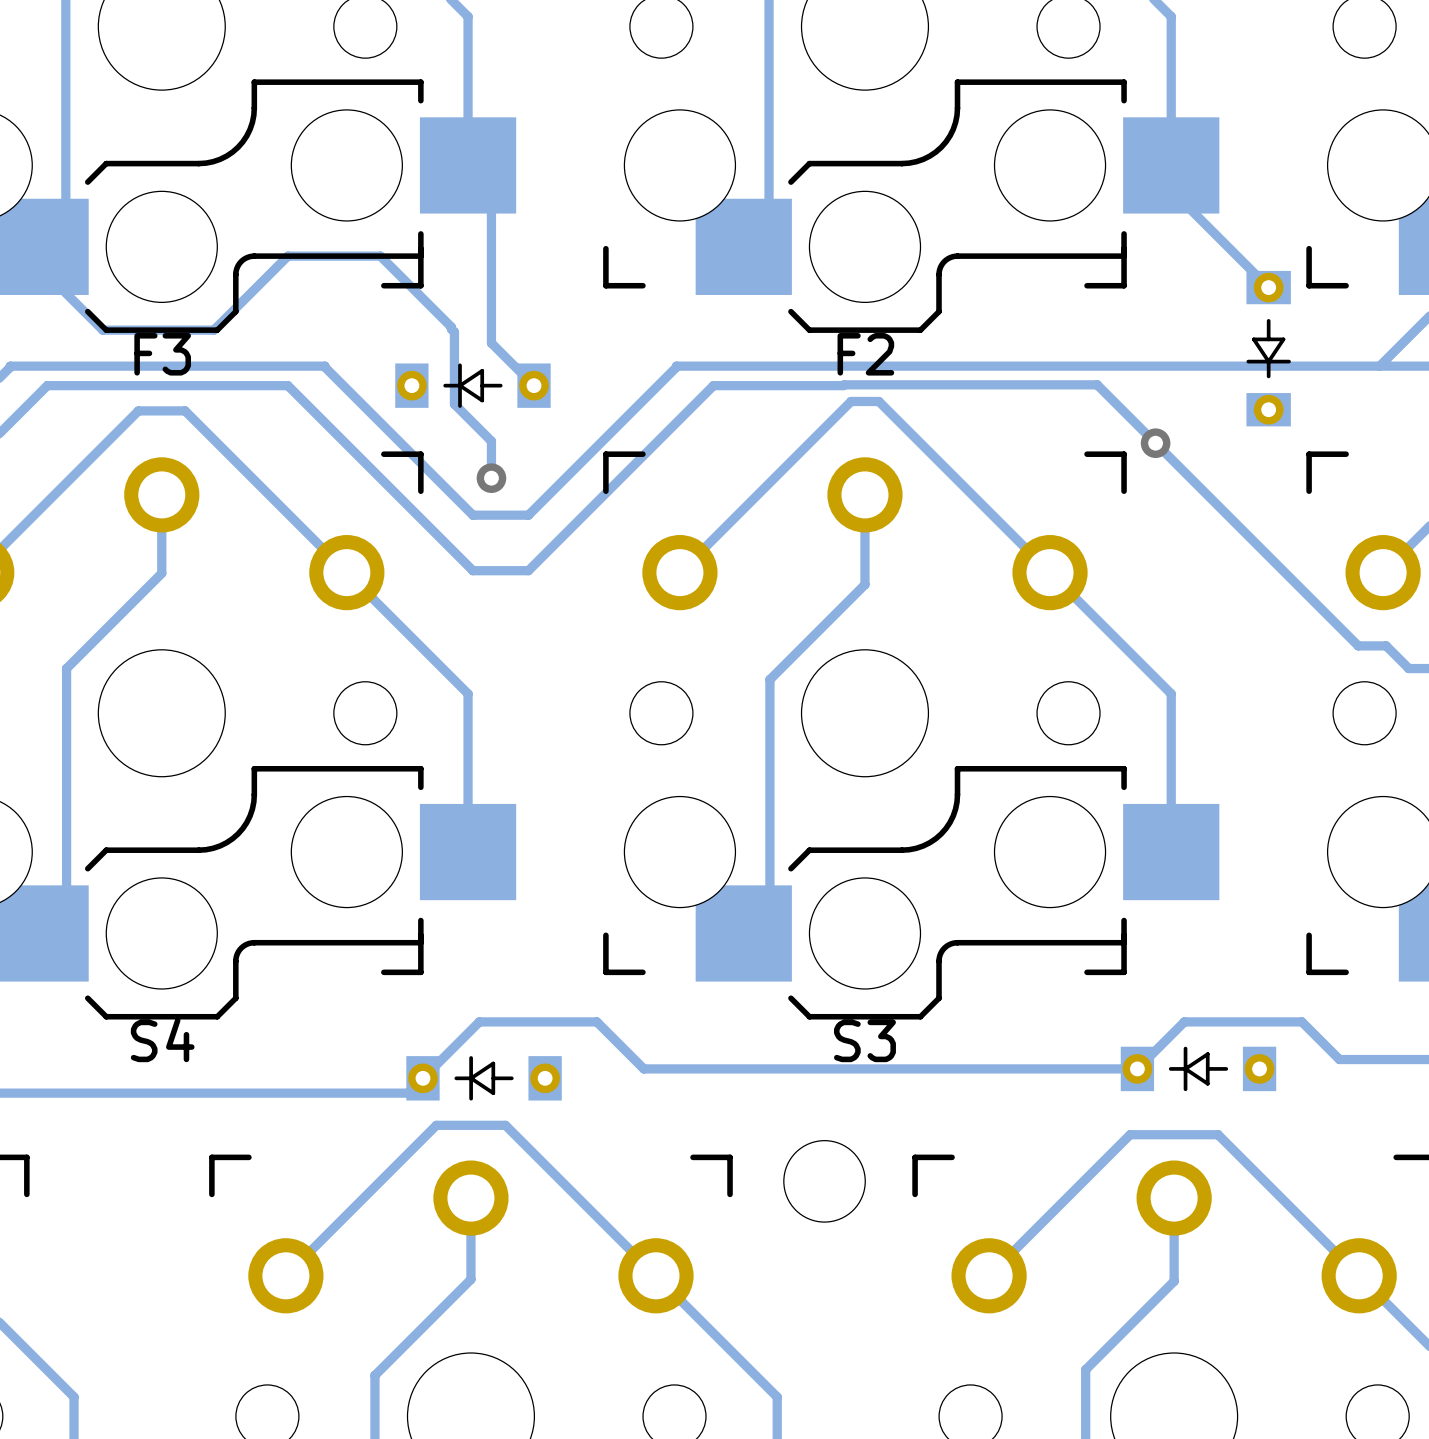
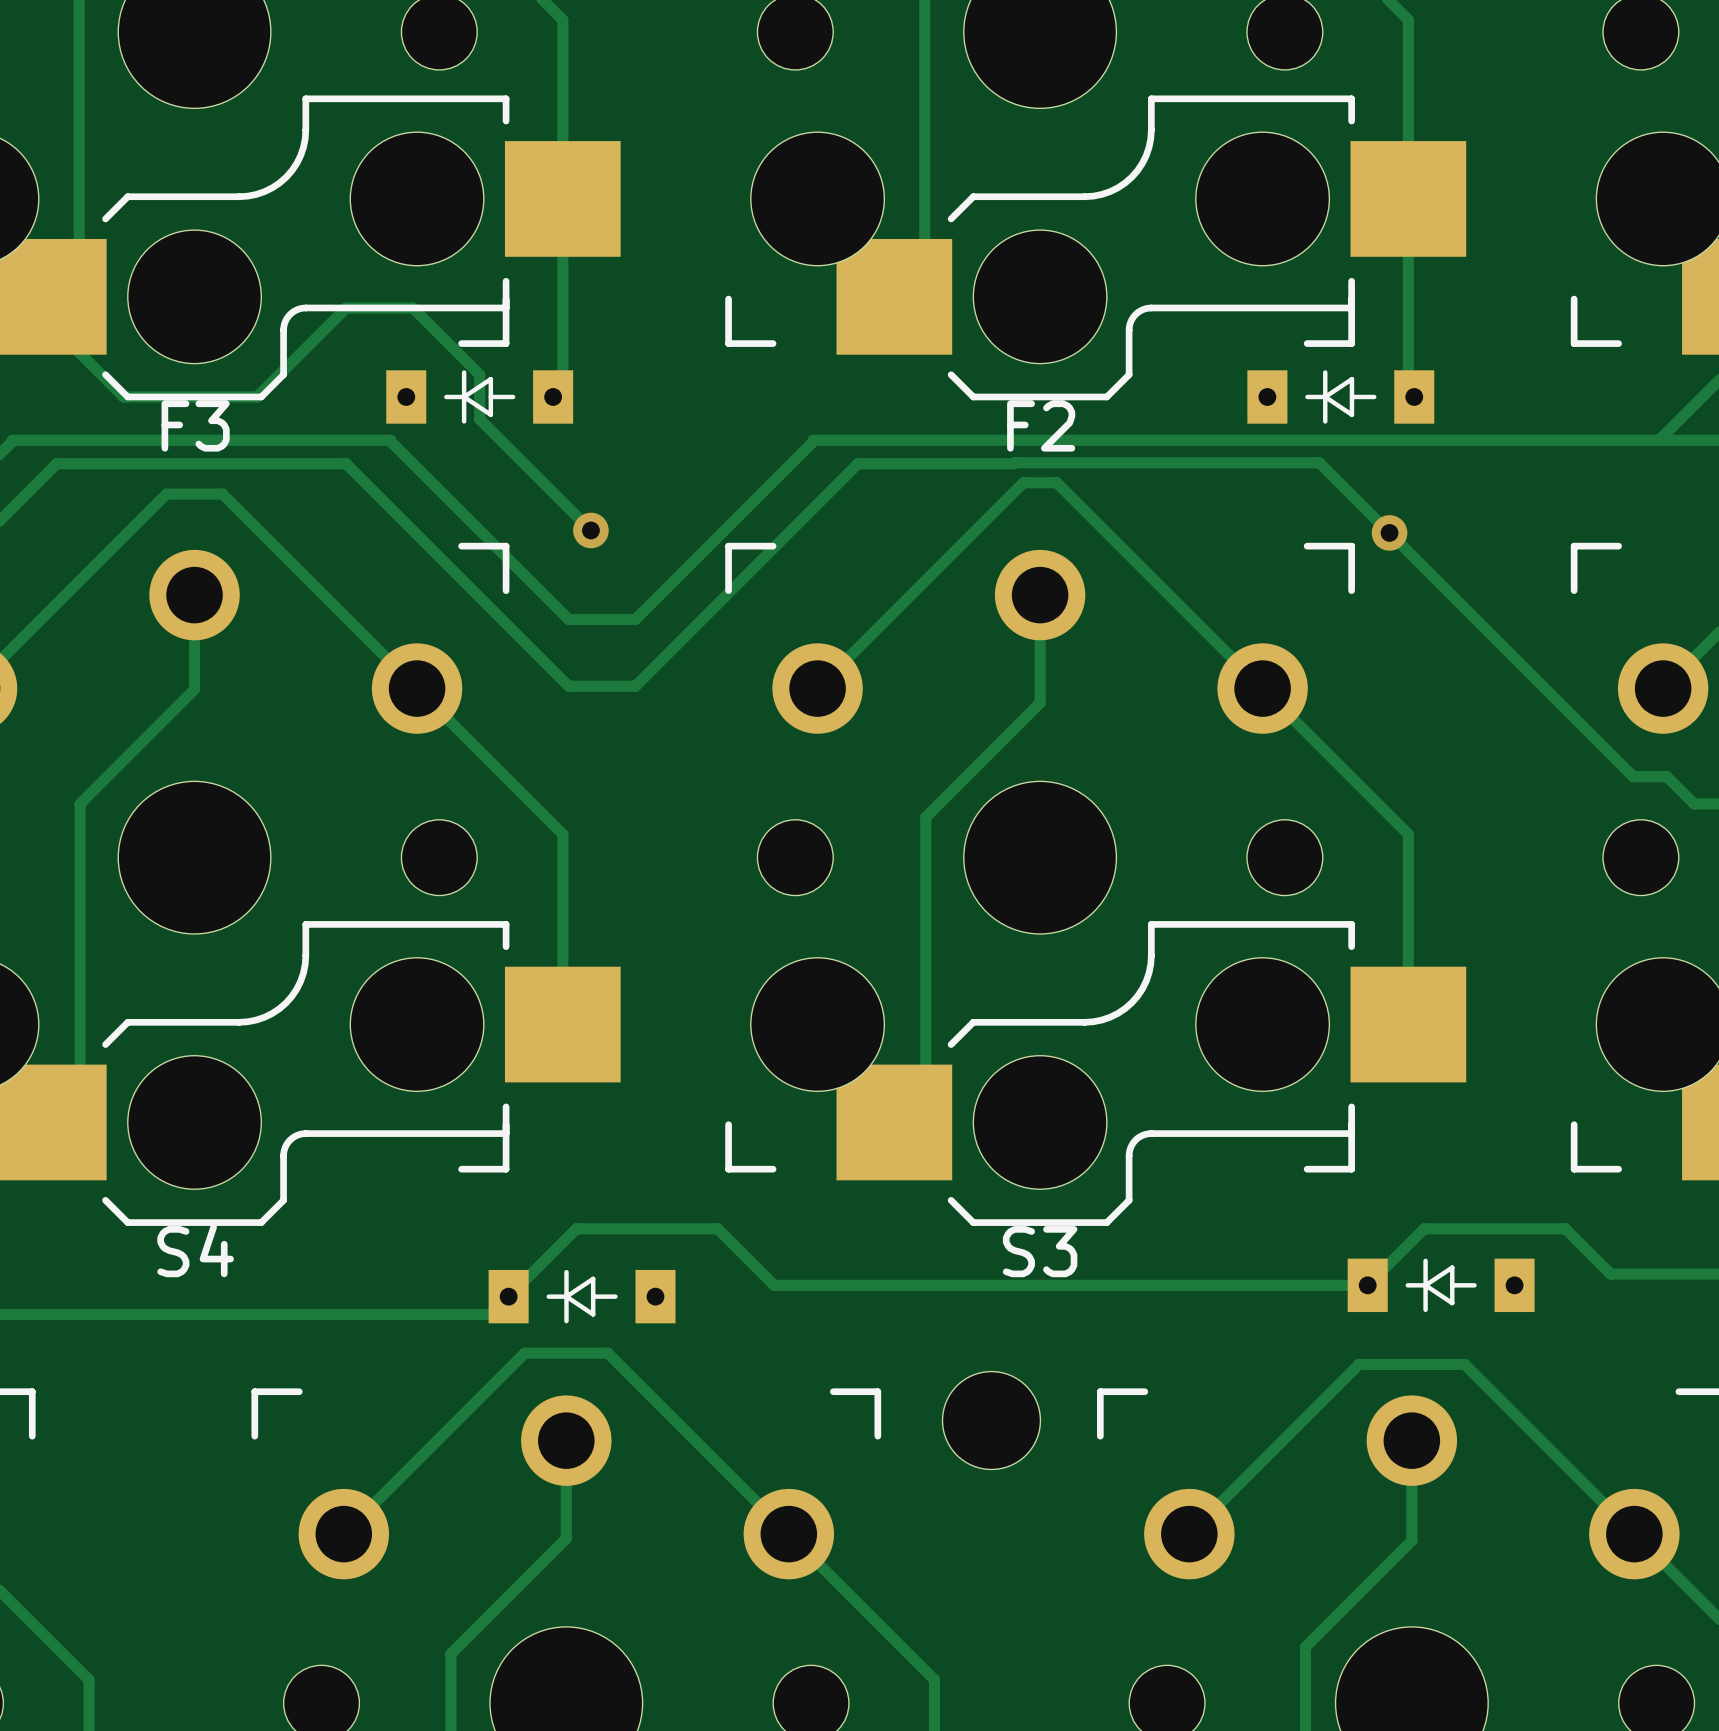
track: (468, 165) (491, 188) (491, 343) (534, 385) -> none
track: none -> (562, 210) (562, 387) (553, 396)
track: (1171, 190) (1268, 287) -> (1408, 228) (1408, 391) (1414, 396)
track: (343, 256) (380, 256) (451, 327) (454, 332) (454, 404) -> (412, 307) (479, 374) (479, 419) (546, 485)
part rotation: 0° (1268, 348) -> 90° clockwise (1340, 396)
part position: (1268, 348) -> (1340, 396)
part position: (472, 385) -> (479, 396)
track: (491, 441) (491, 478) -> none
via position: (491, 478) -> (590, 530)

